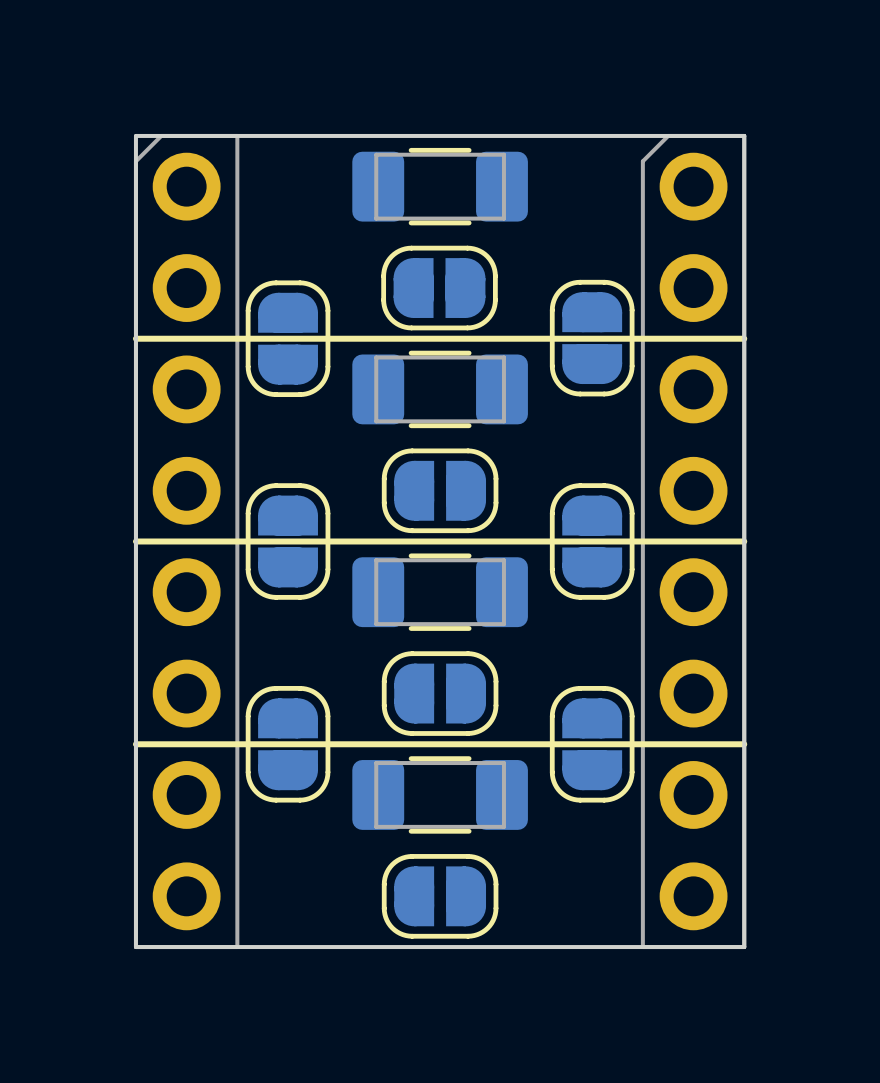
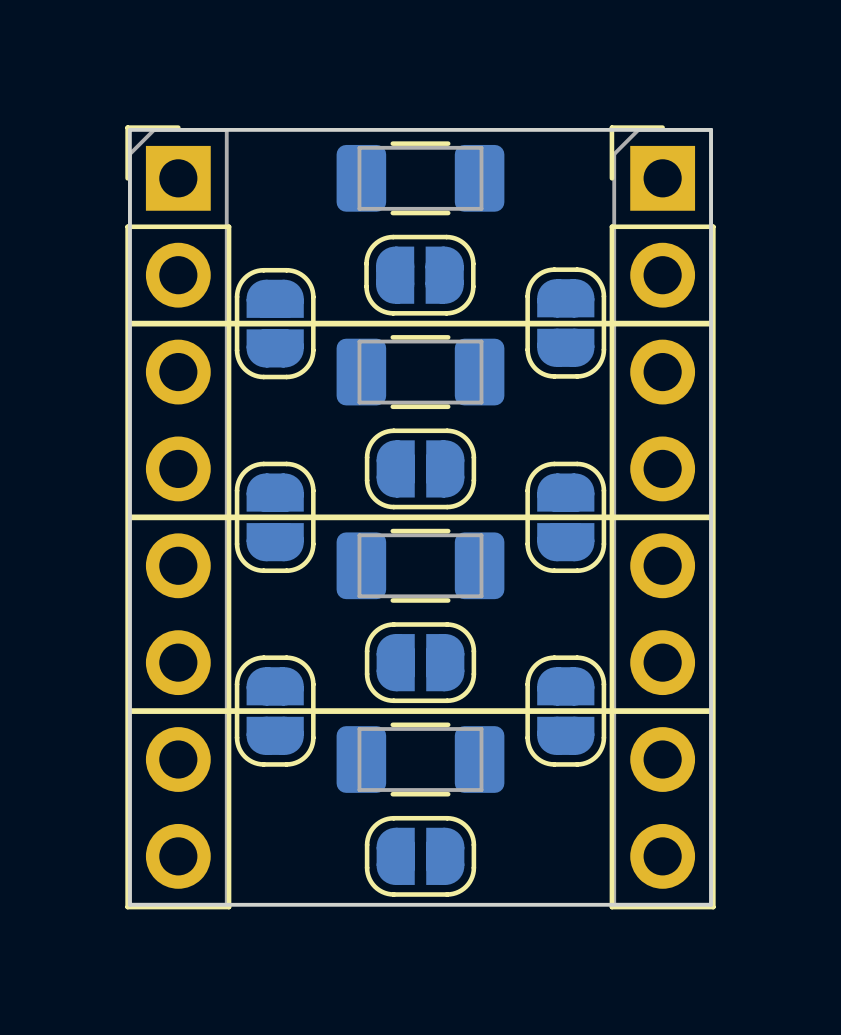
part footprint: [133, 133, 240, 950] -> [125, 125, 232, 910]
part footprint: [640, 133, 747, 950] -> [609, 125, 716, 910]

